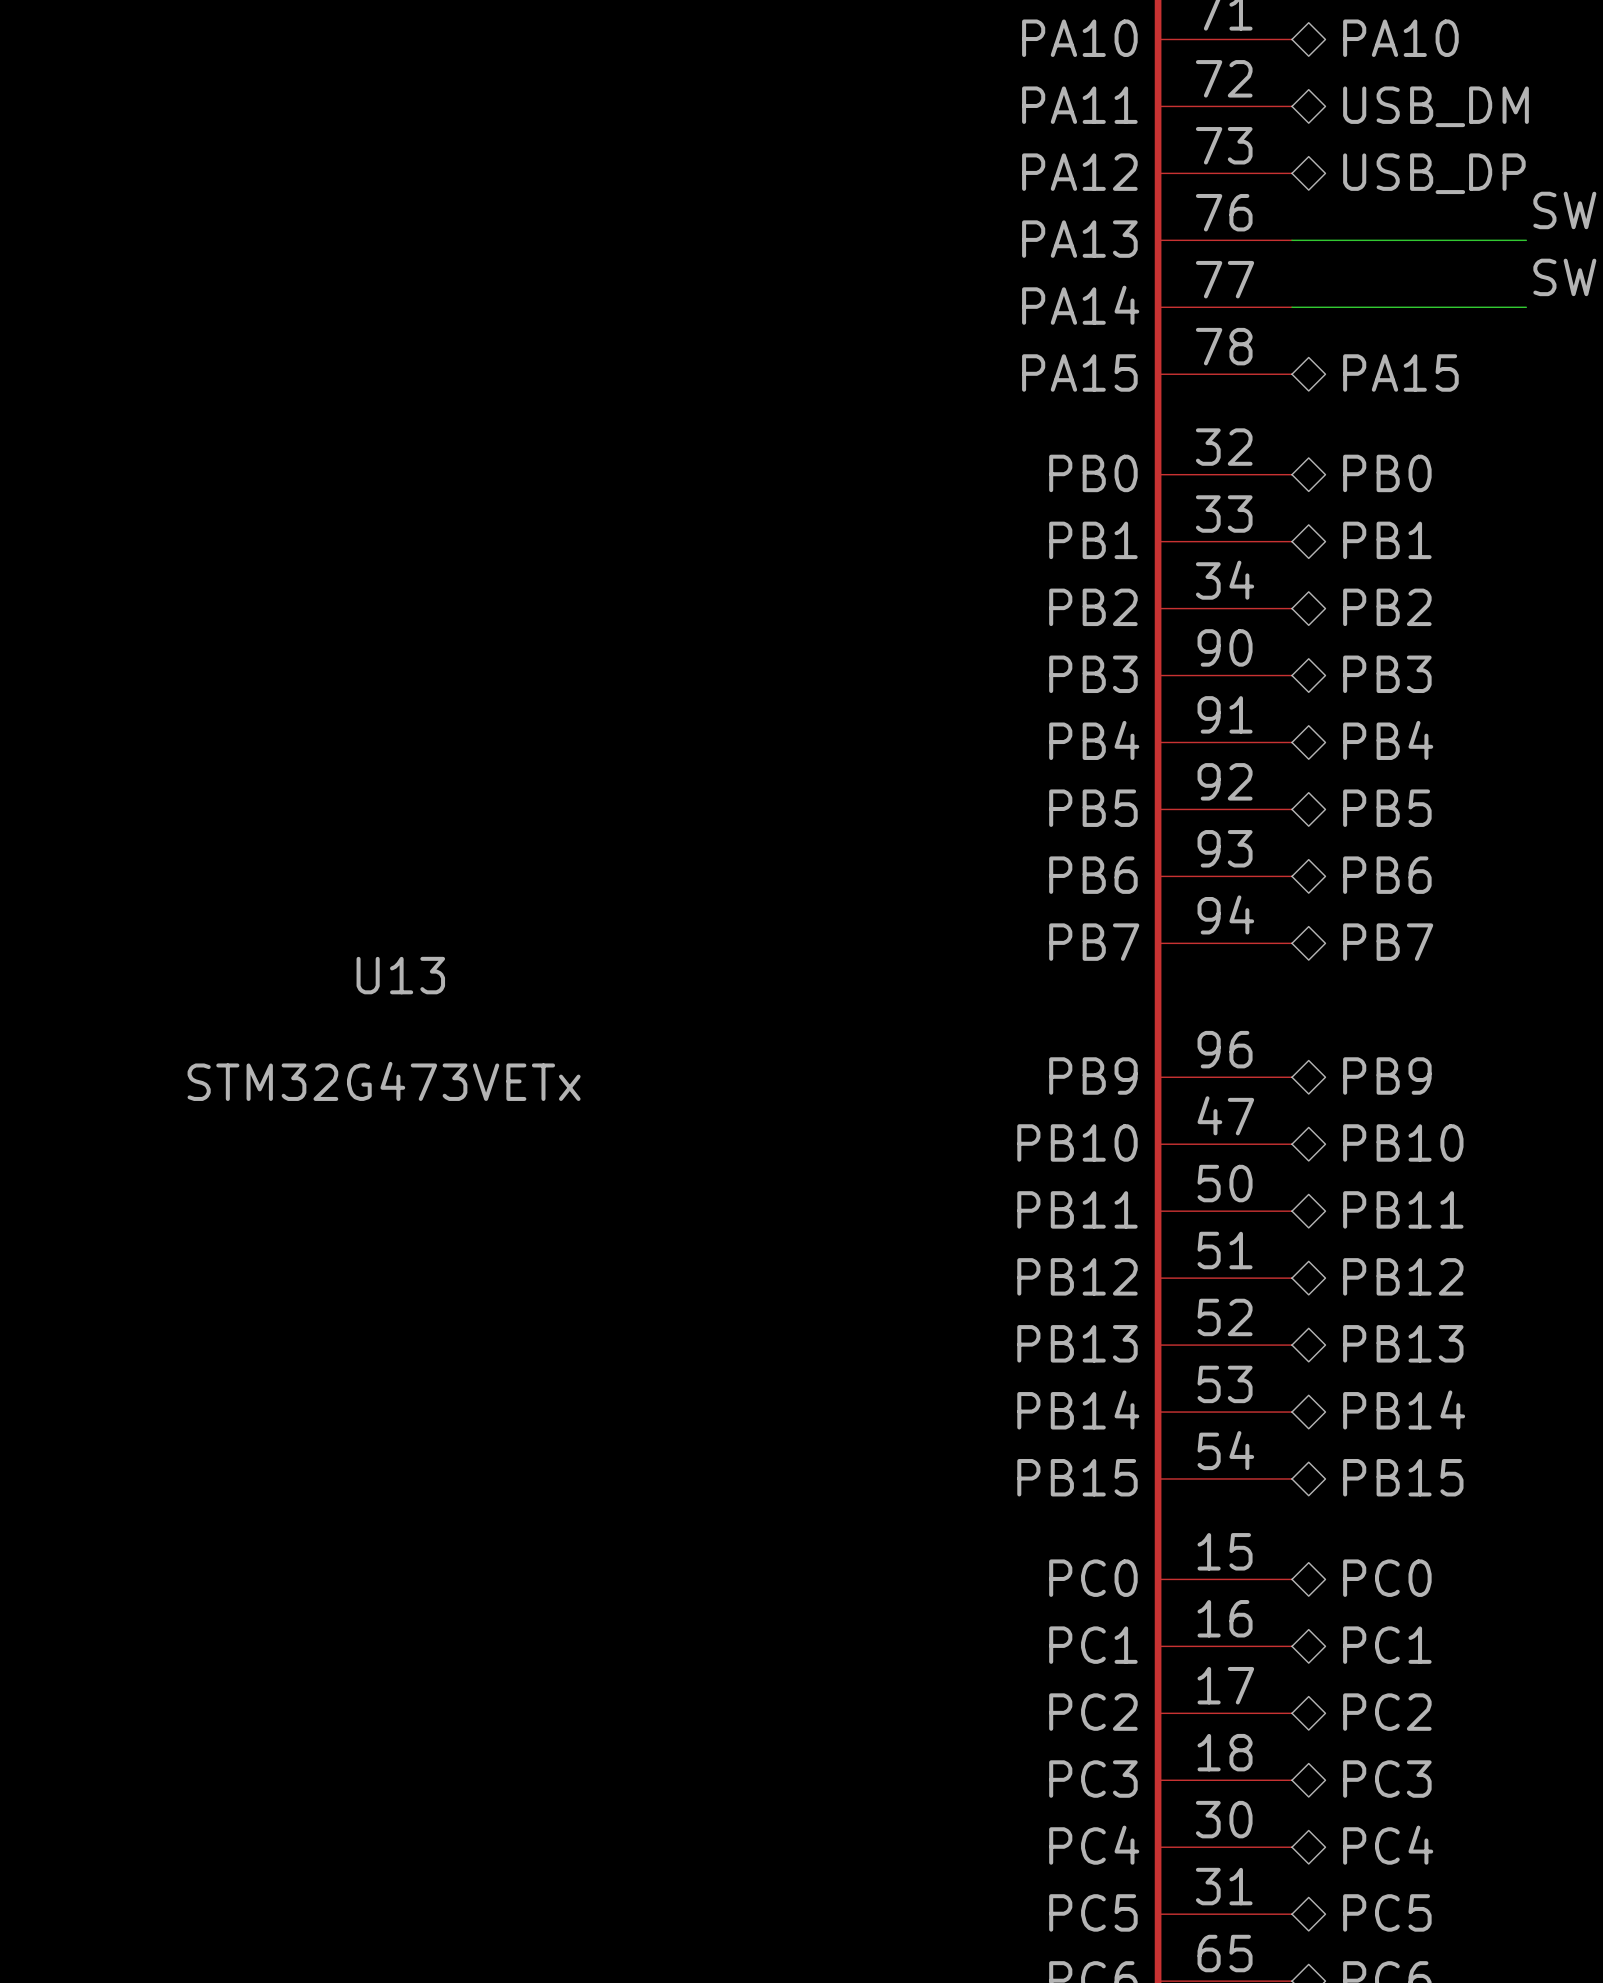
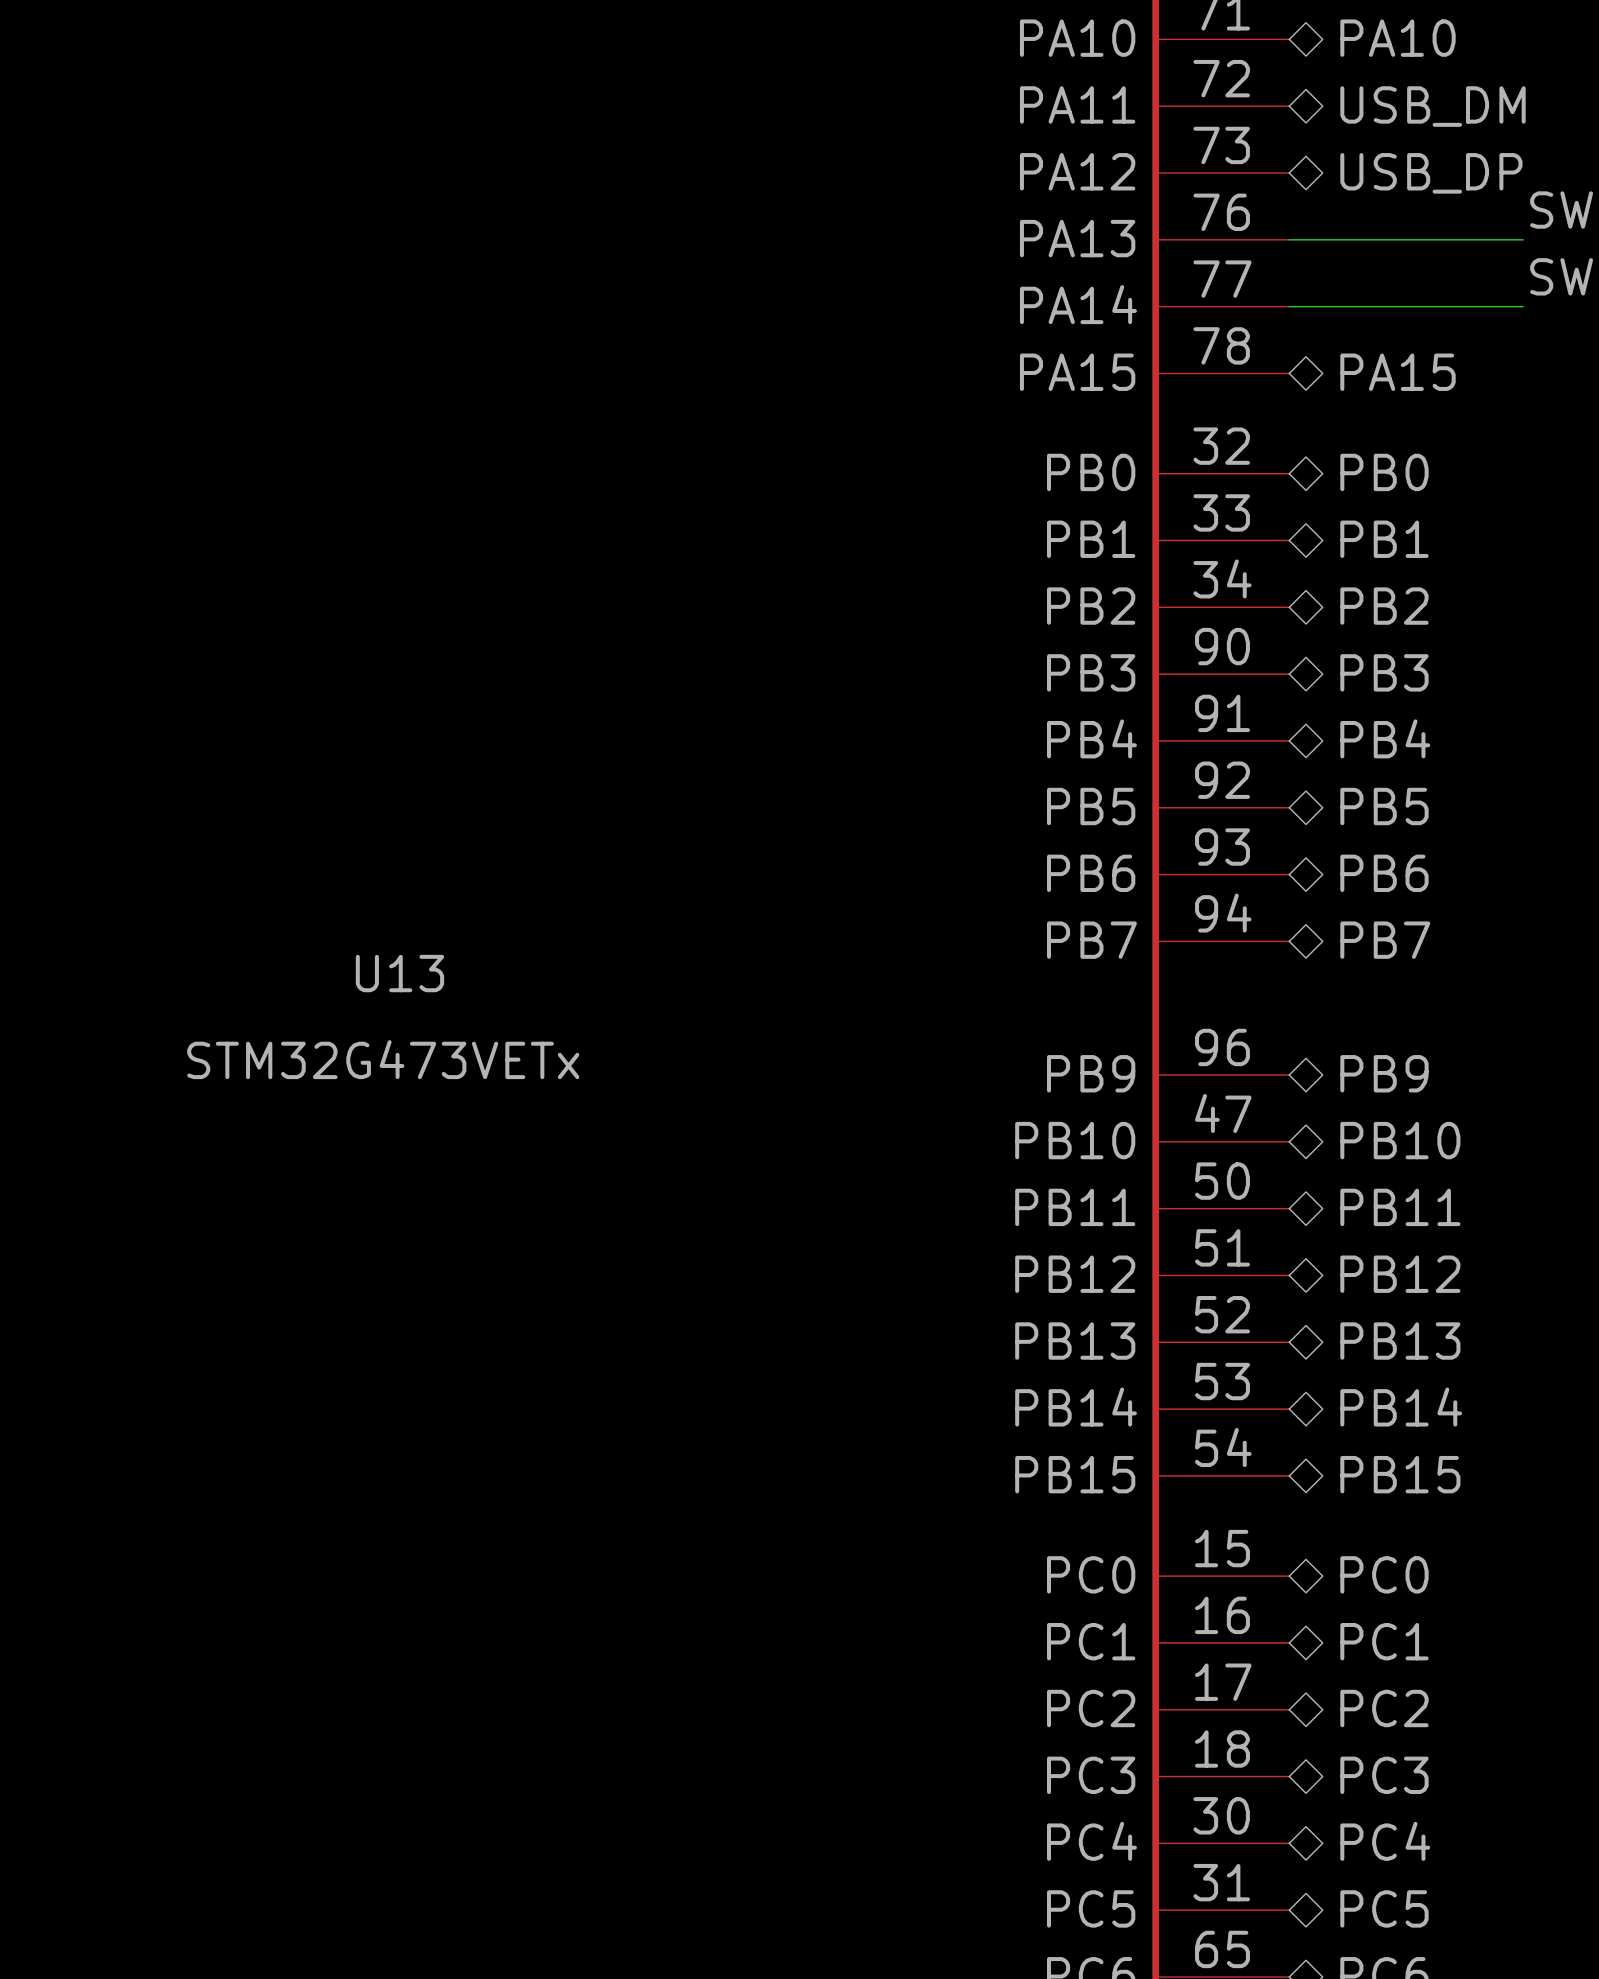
U13 value position: STM32G473VETx (384, 1081) -> STM32G473VETx (383, 1059)

